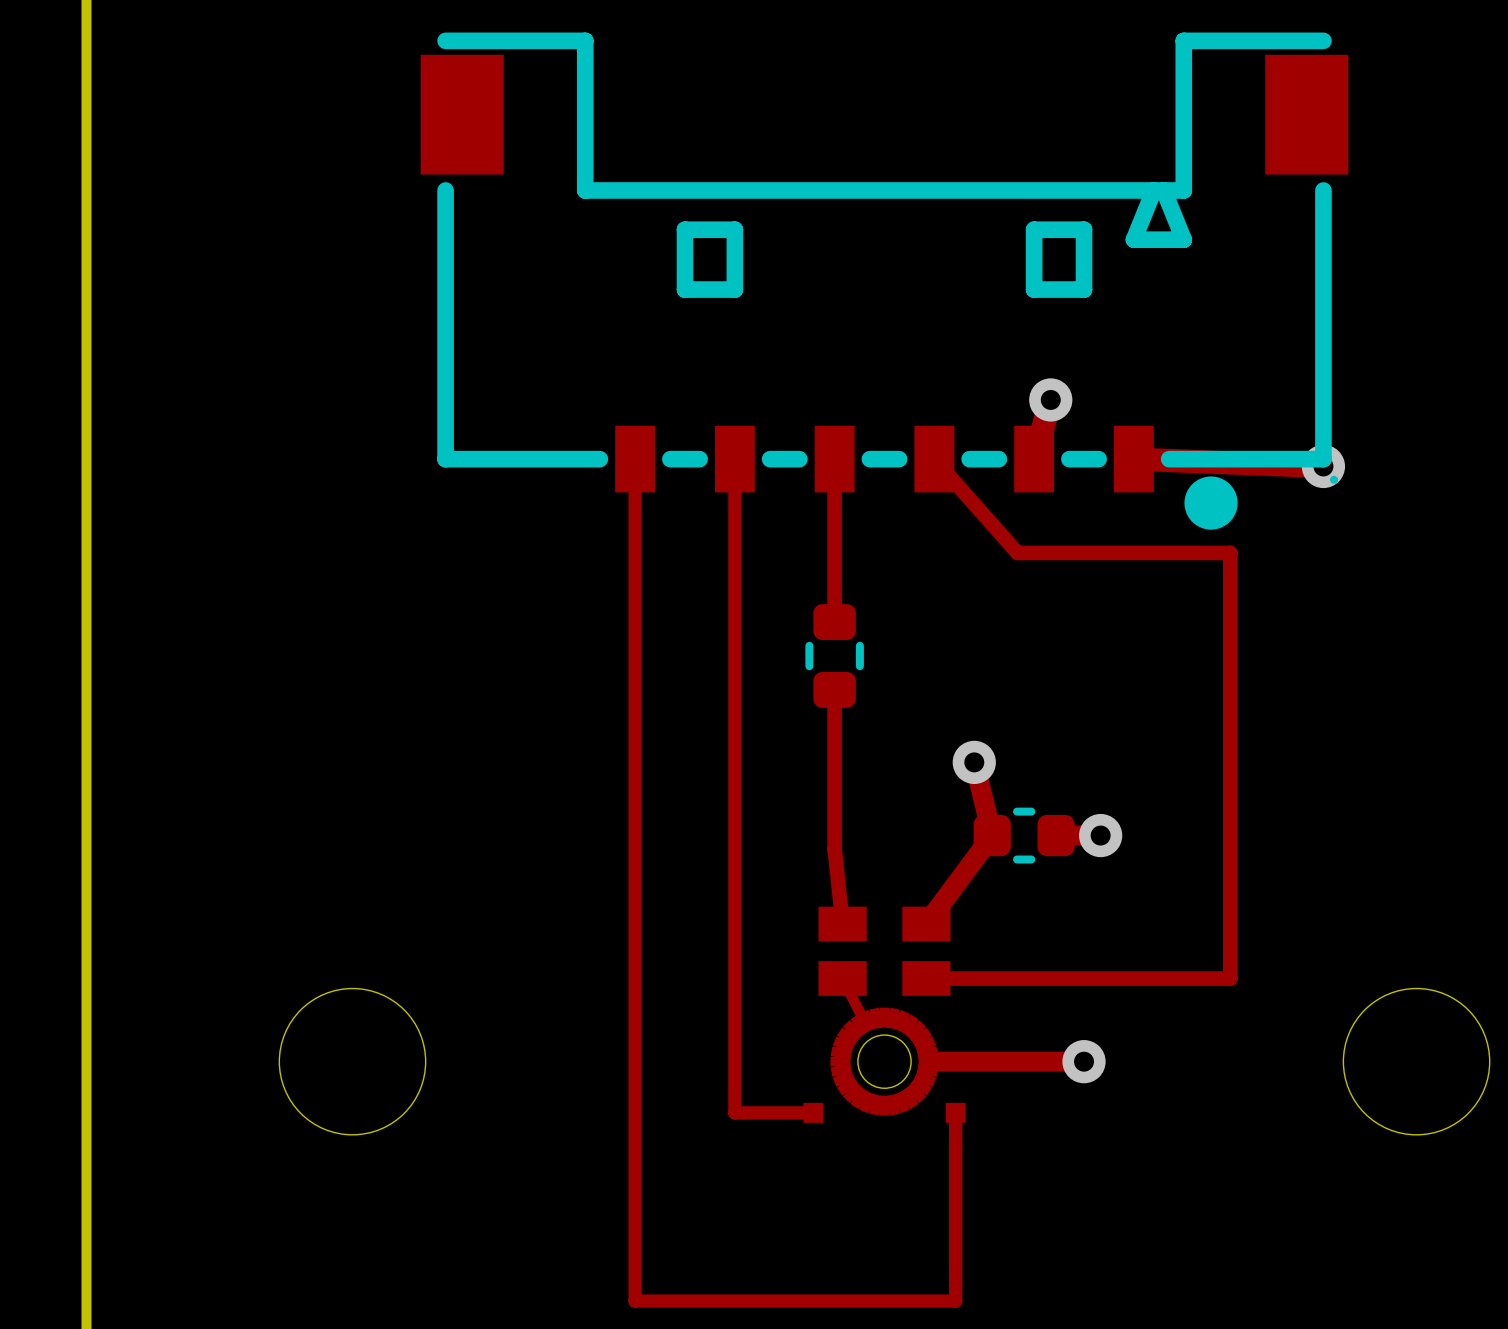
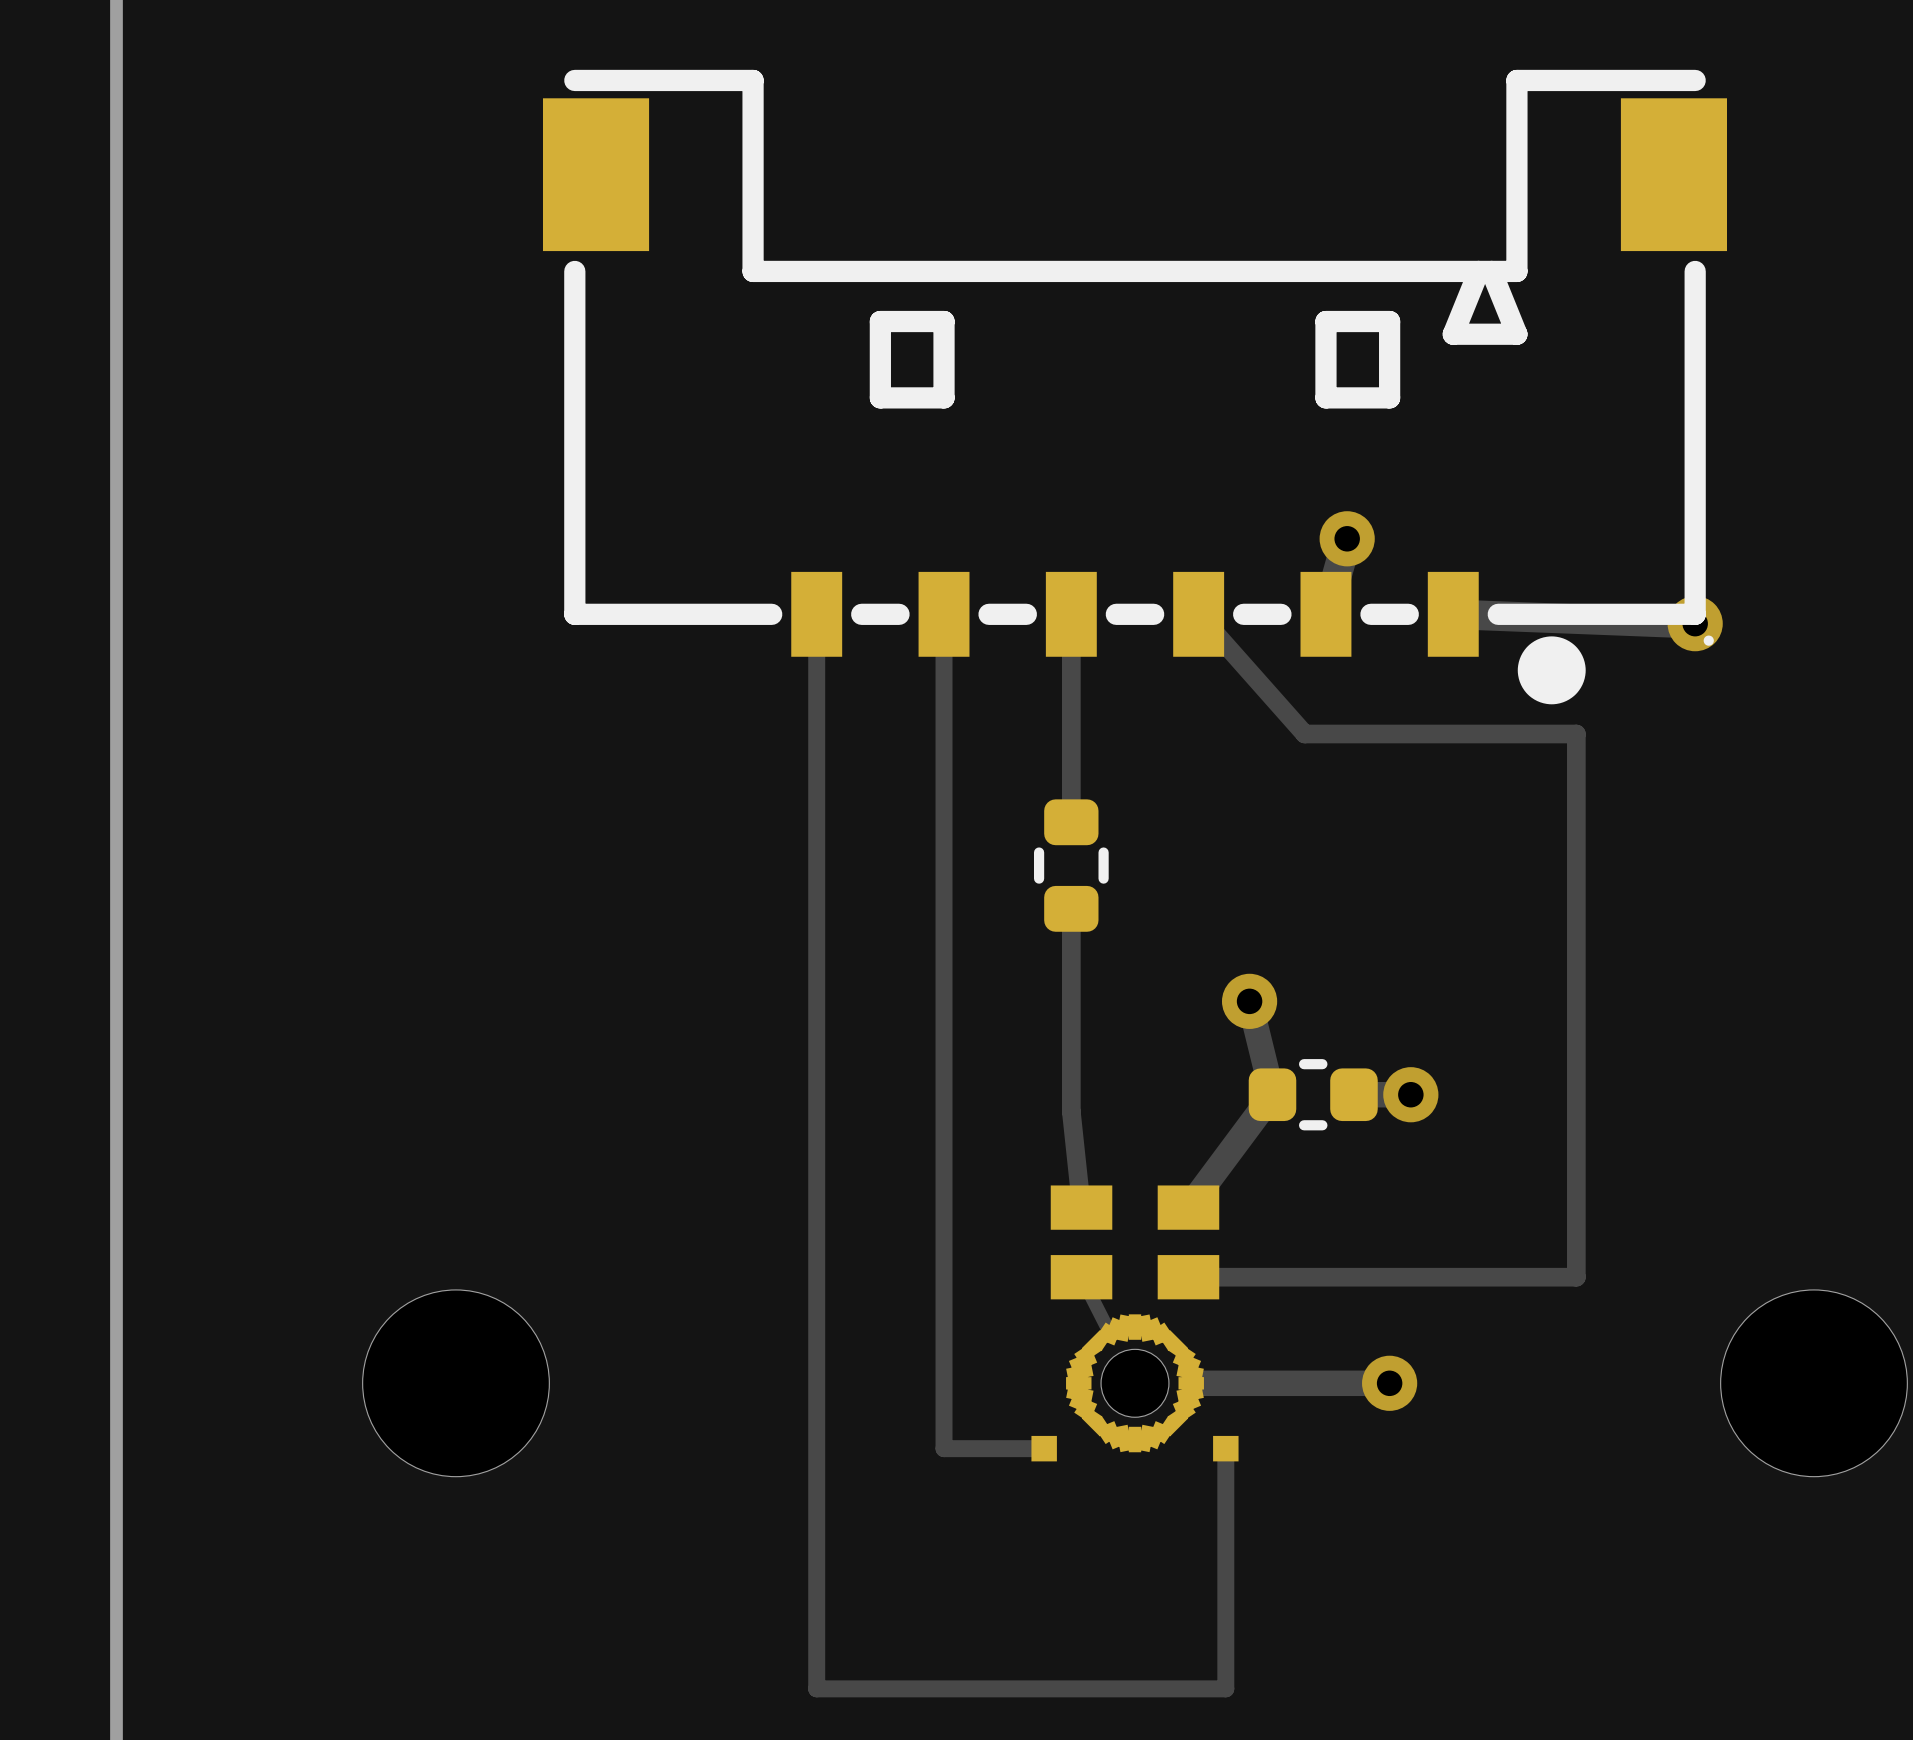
part footprint: [803, 906, 966, 1123] -> [1031, 1185, 1239, 1462]

